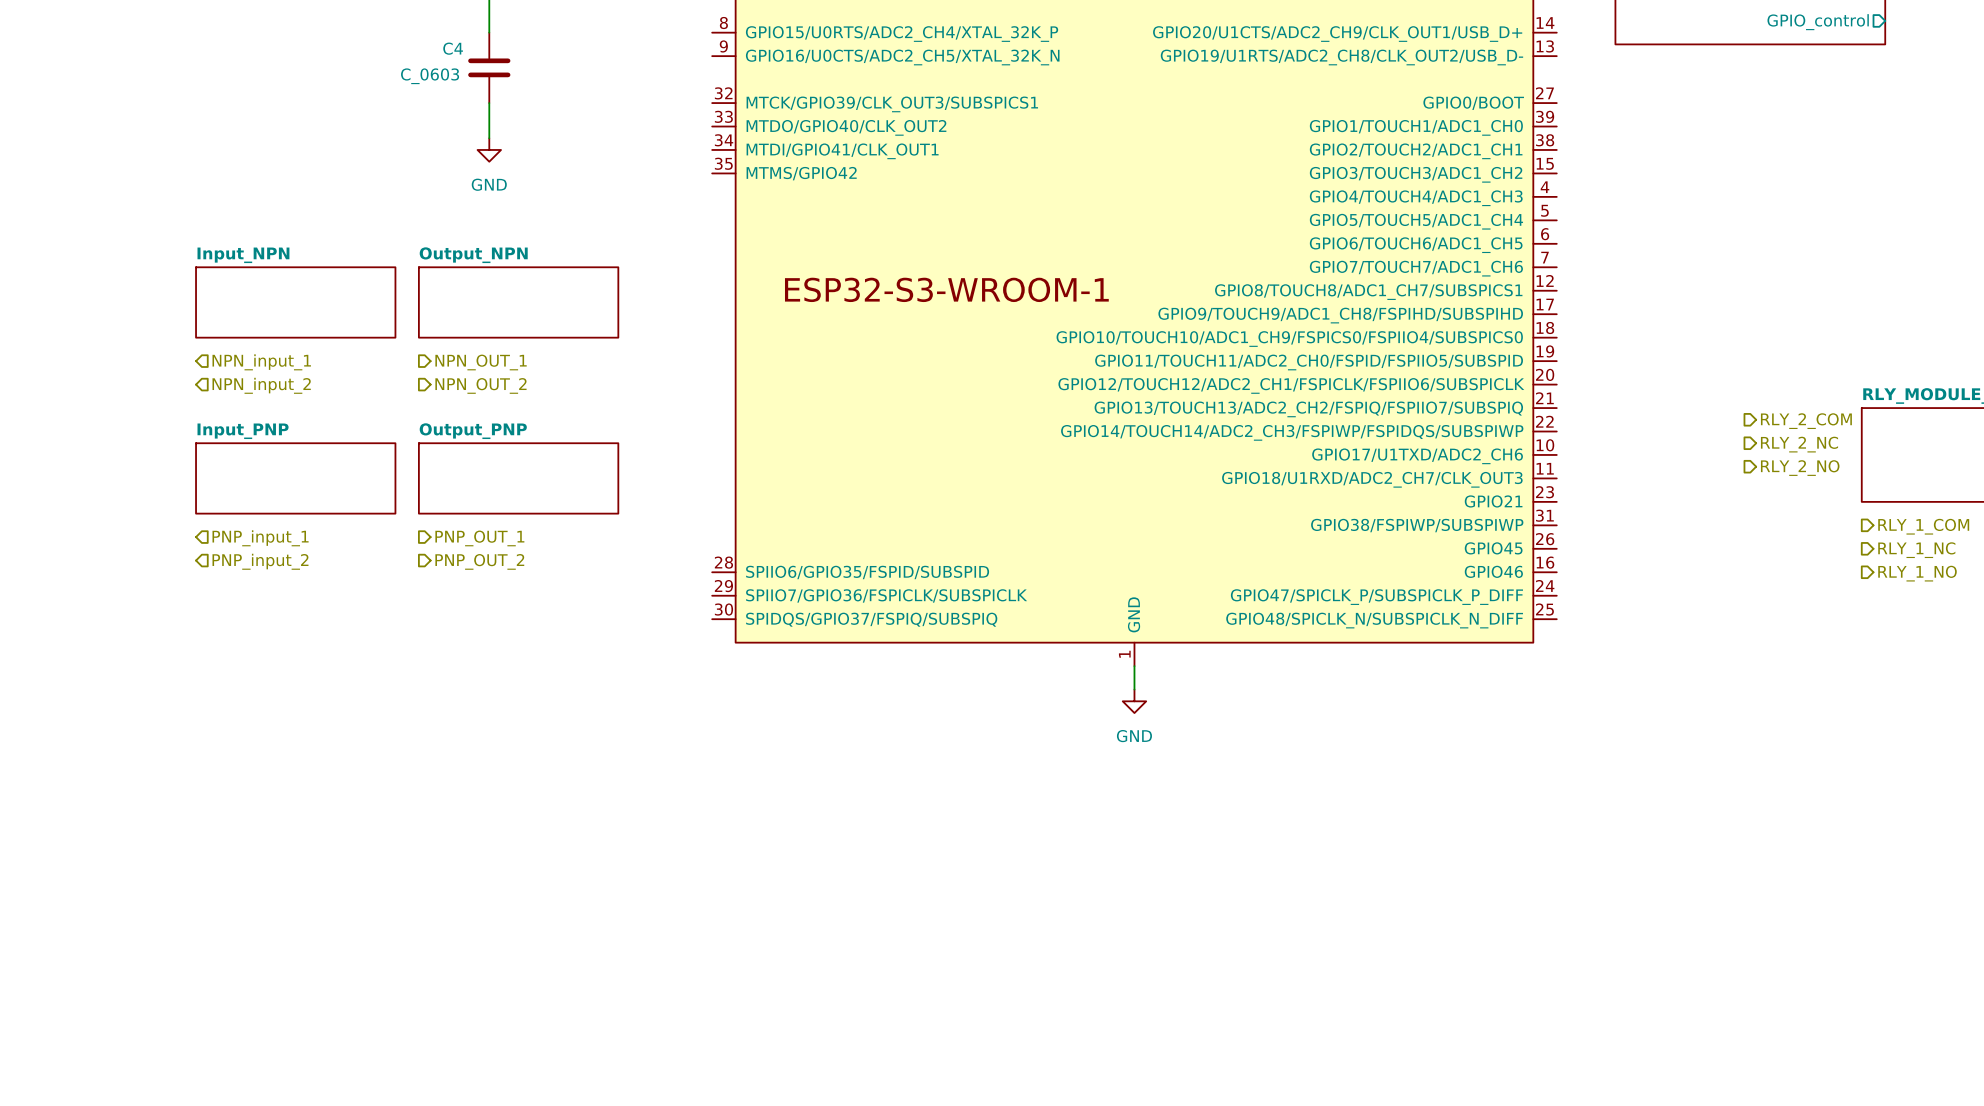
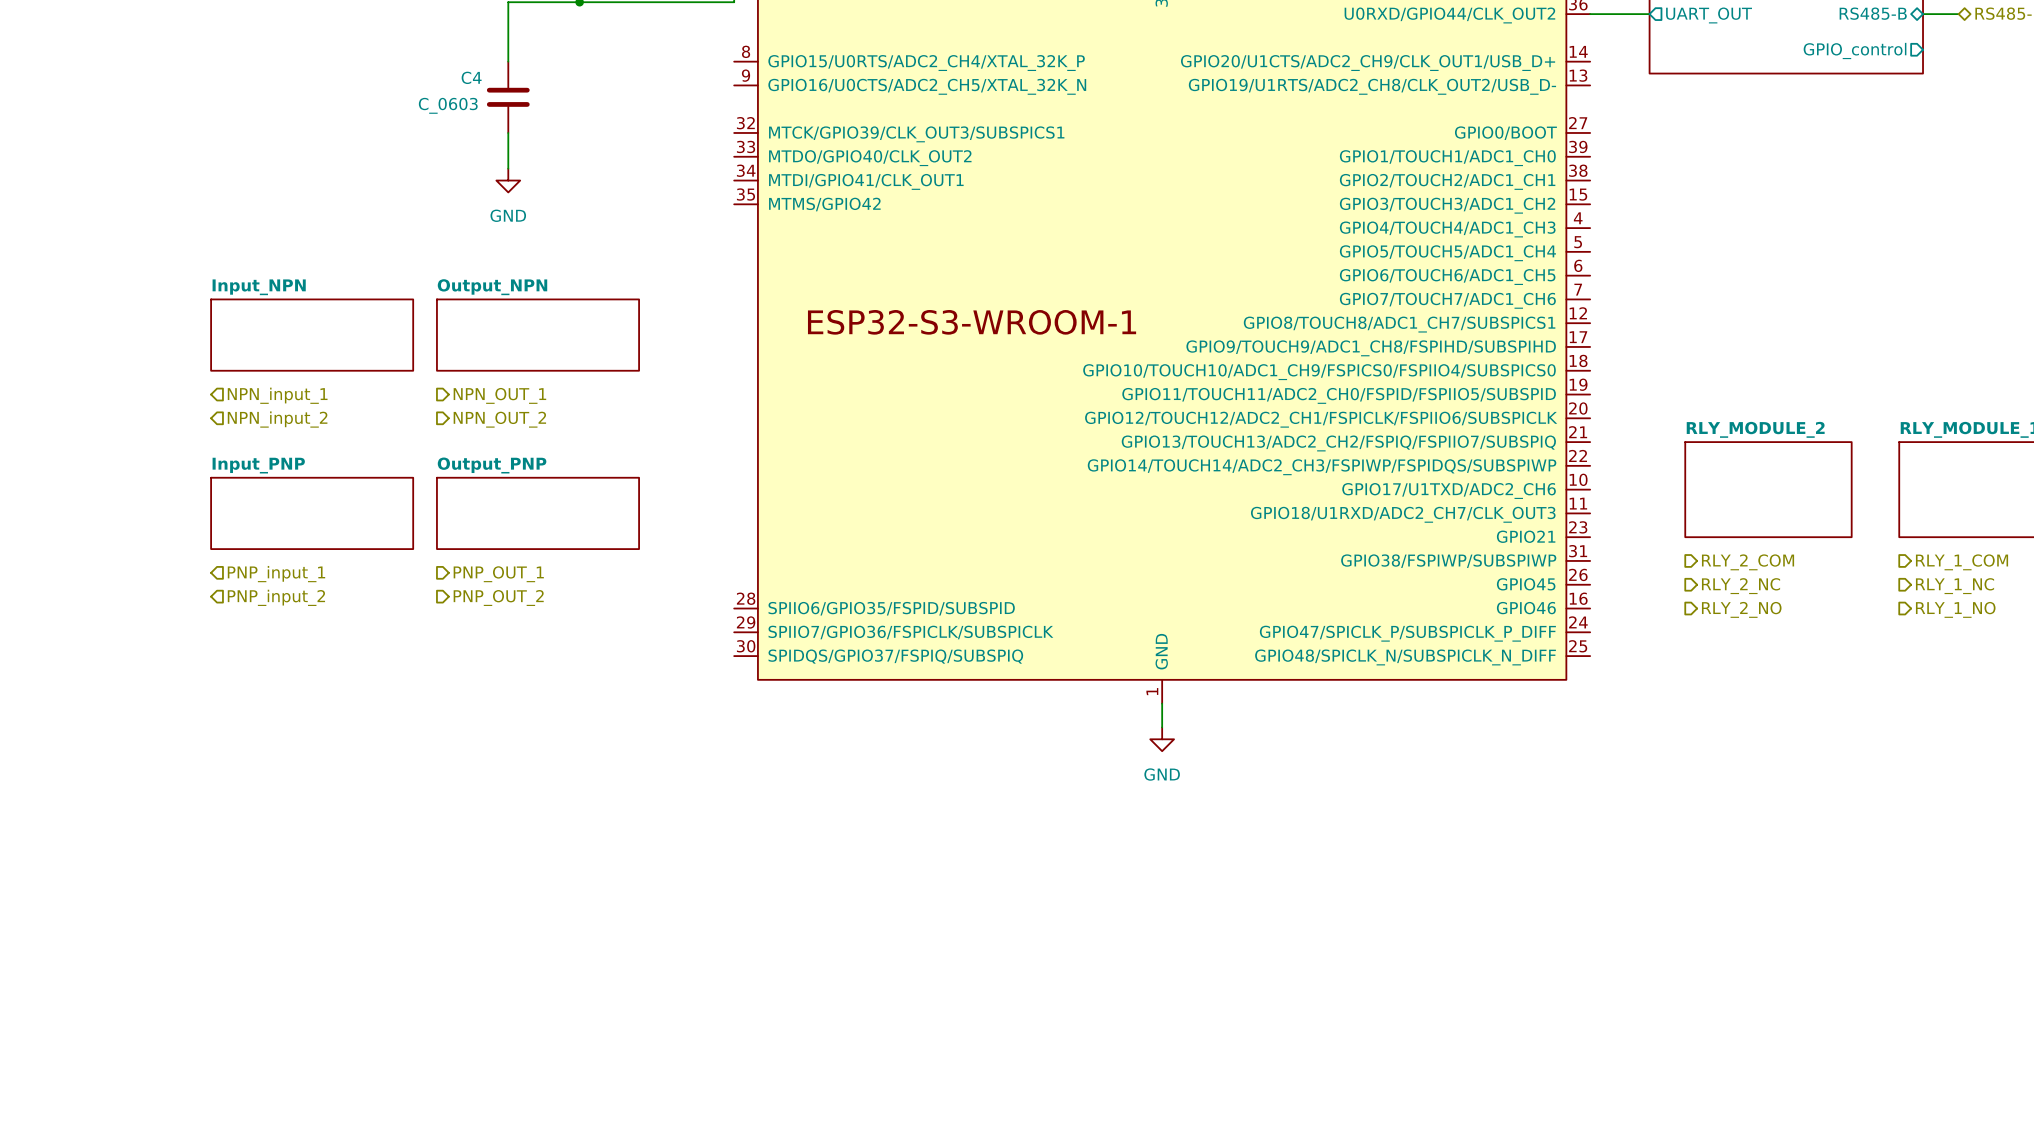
hierarchical label position: RLY_2_COM (1806, 421) -> RLY_2_COM (1748, 562)
hierarchical label position: RLY_2_NC (1799, 444) -> RLY_2_NC (1741, 586)
sheet RLY_MODULE_2: none -> (1768, 489)
hierarchical label position: RLY_2_NO (1800, 468) -> RLY_2_NO (1741, 609)

